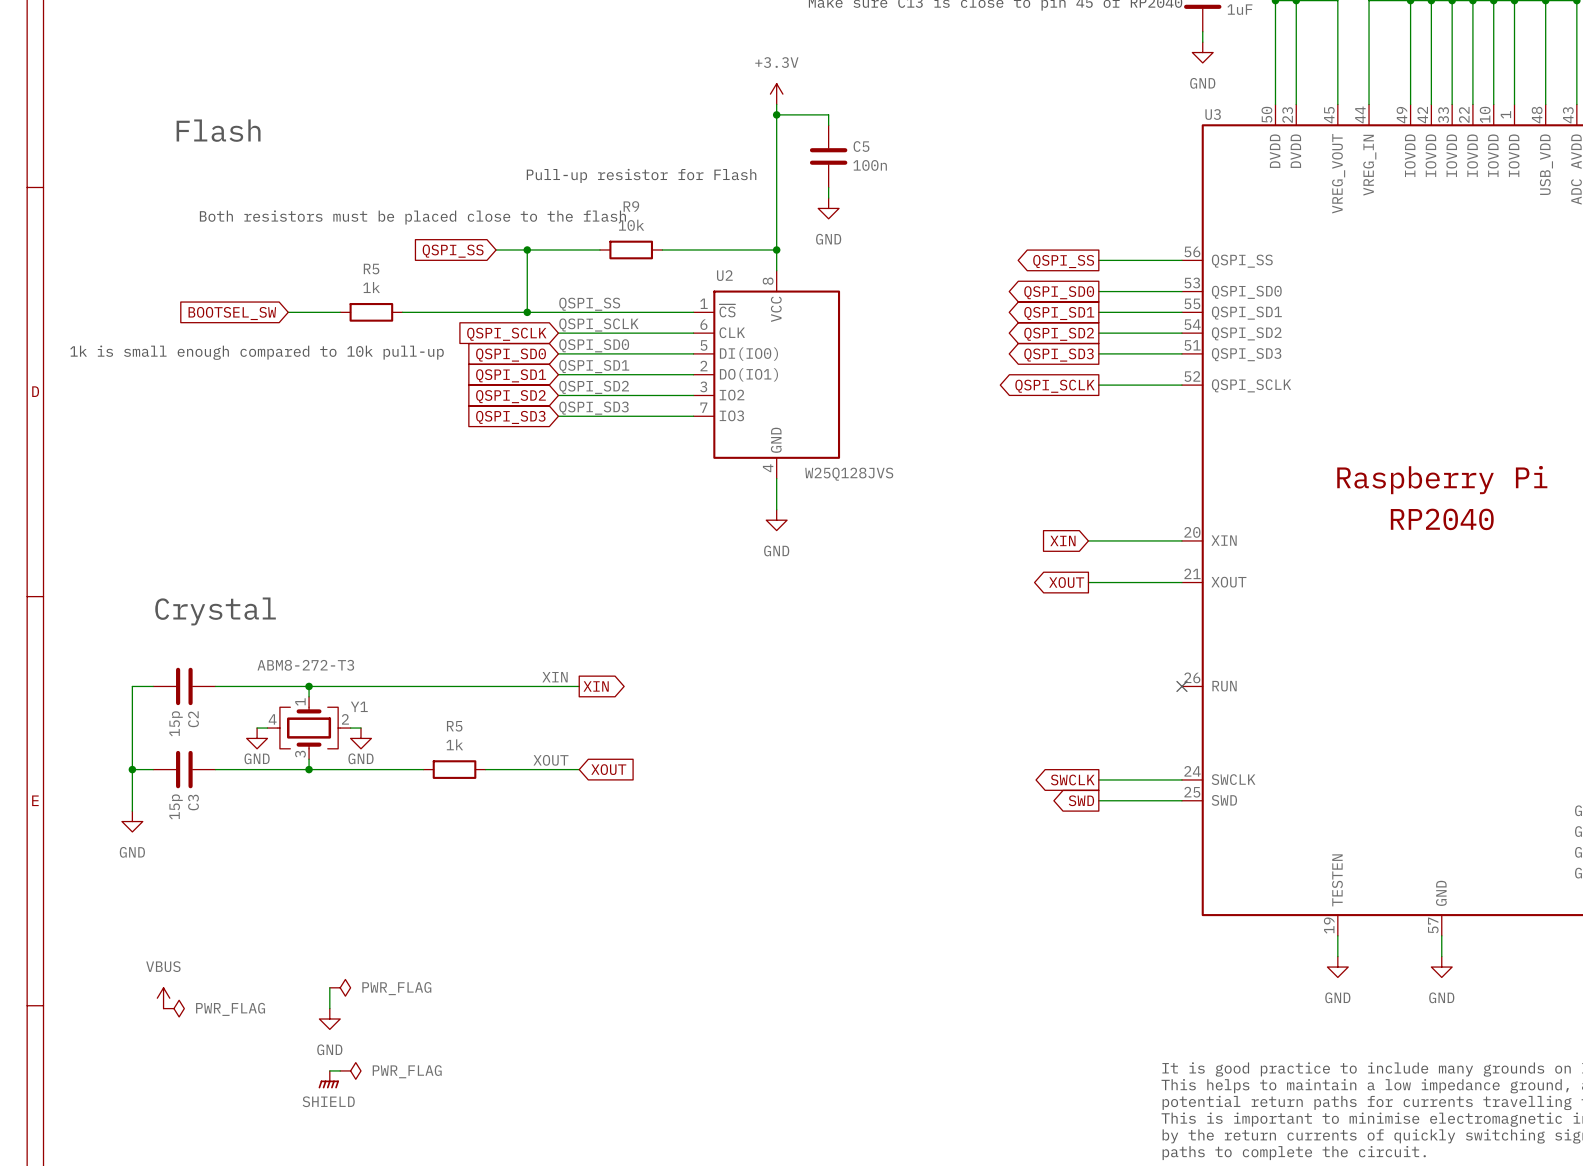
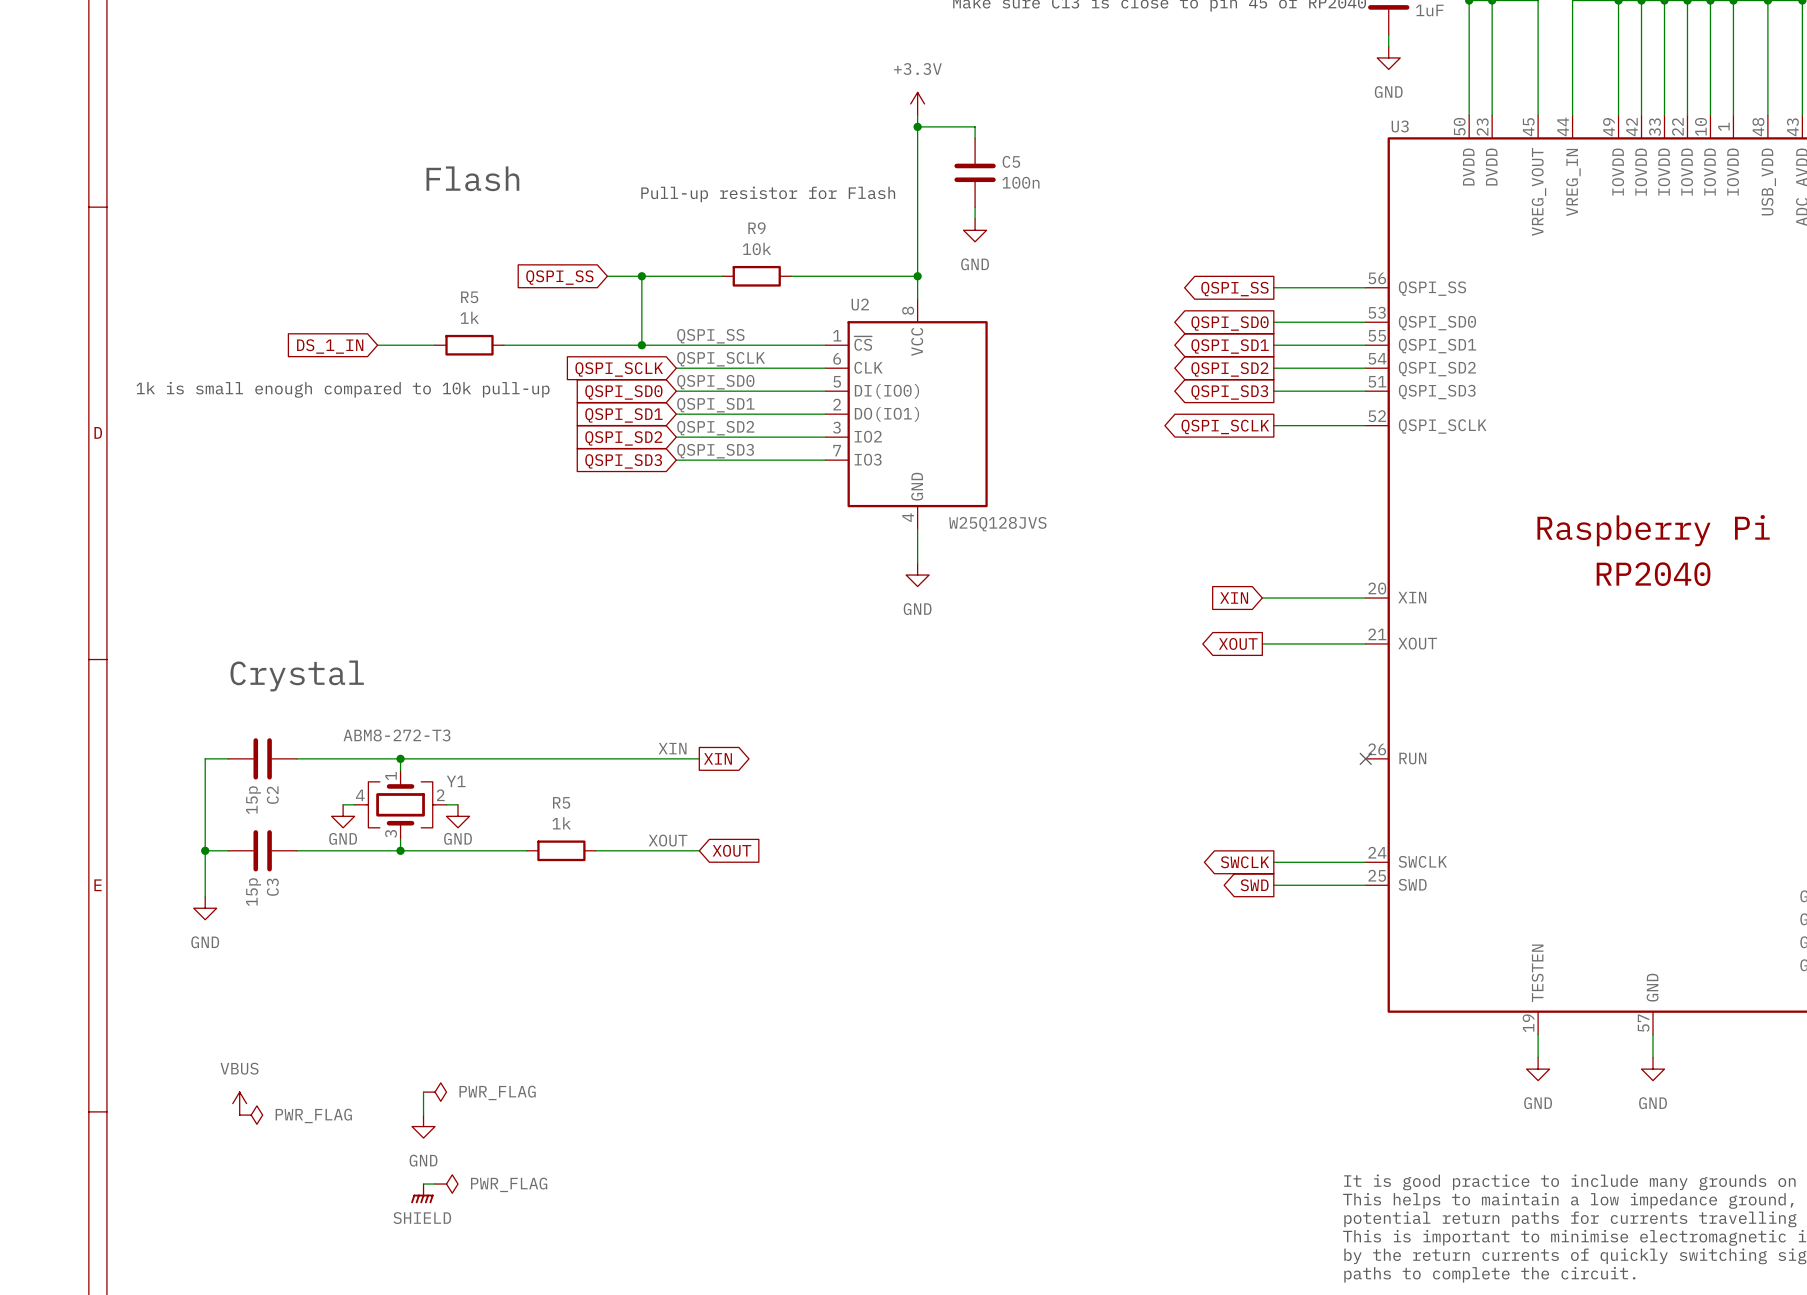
text position: Flash (218, 130) -> Flash (472, 178)
text: Both resistors must be placed close to the flash (412, 217) -> none
global label: BOOTSEL_SW (232, 313) -> DS_1_IN (330, 346)

